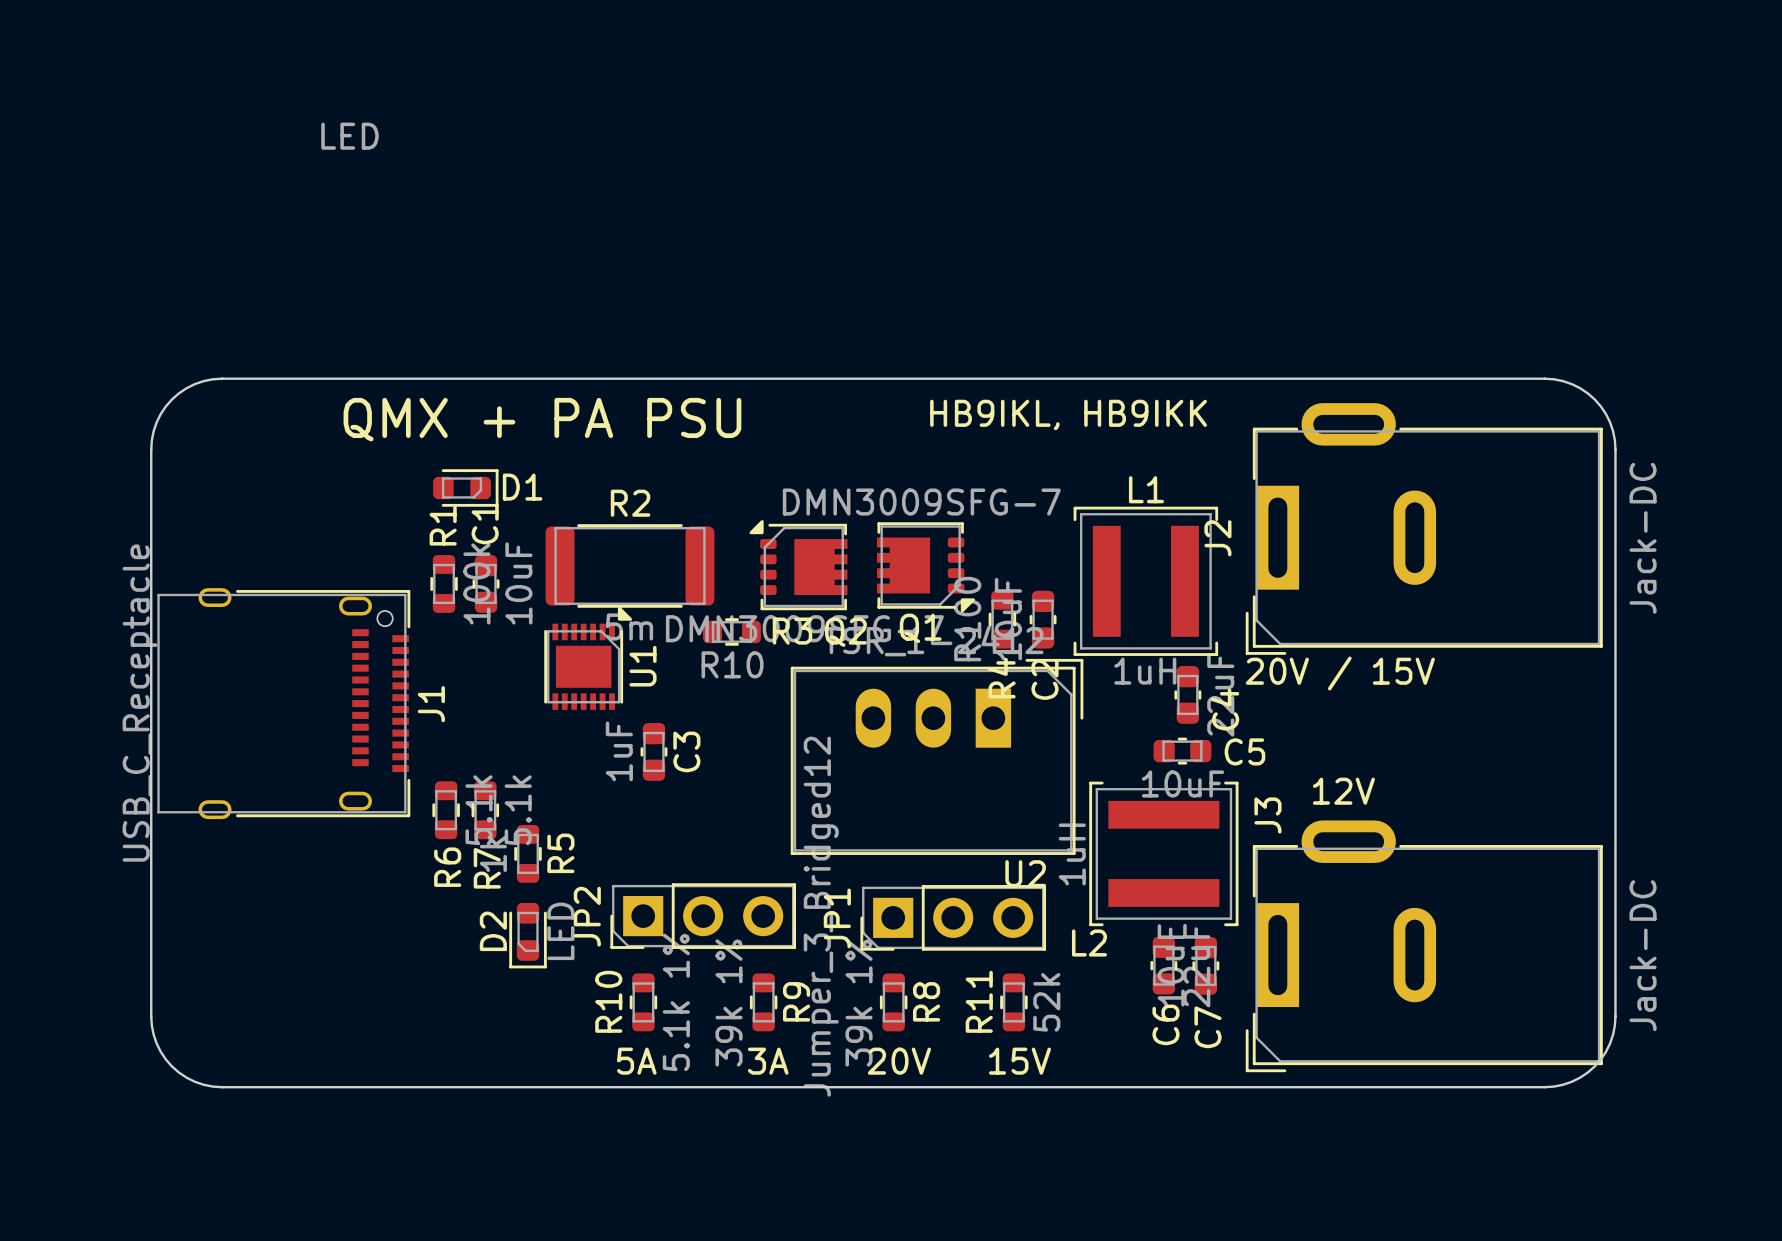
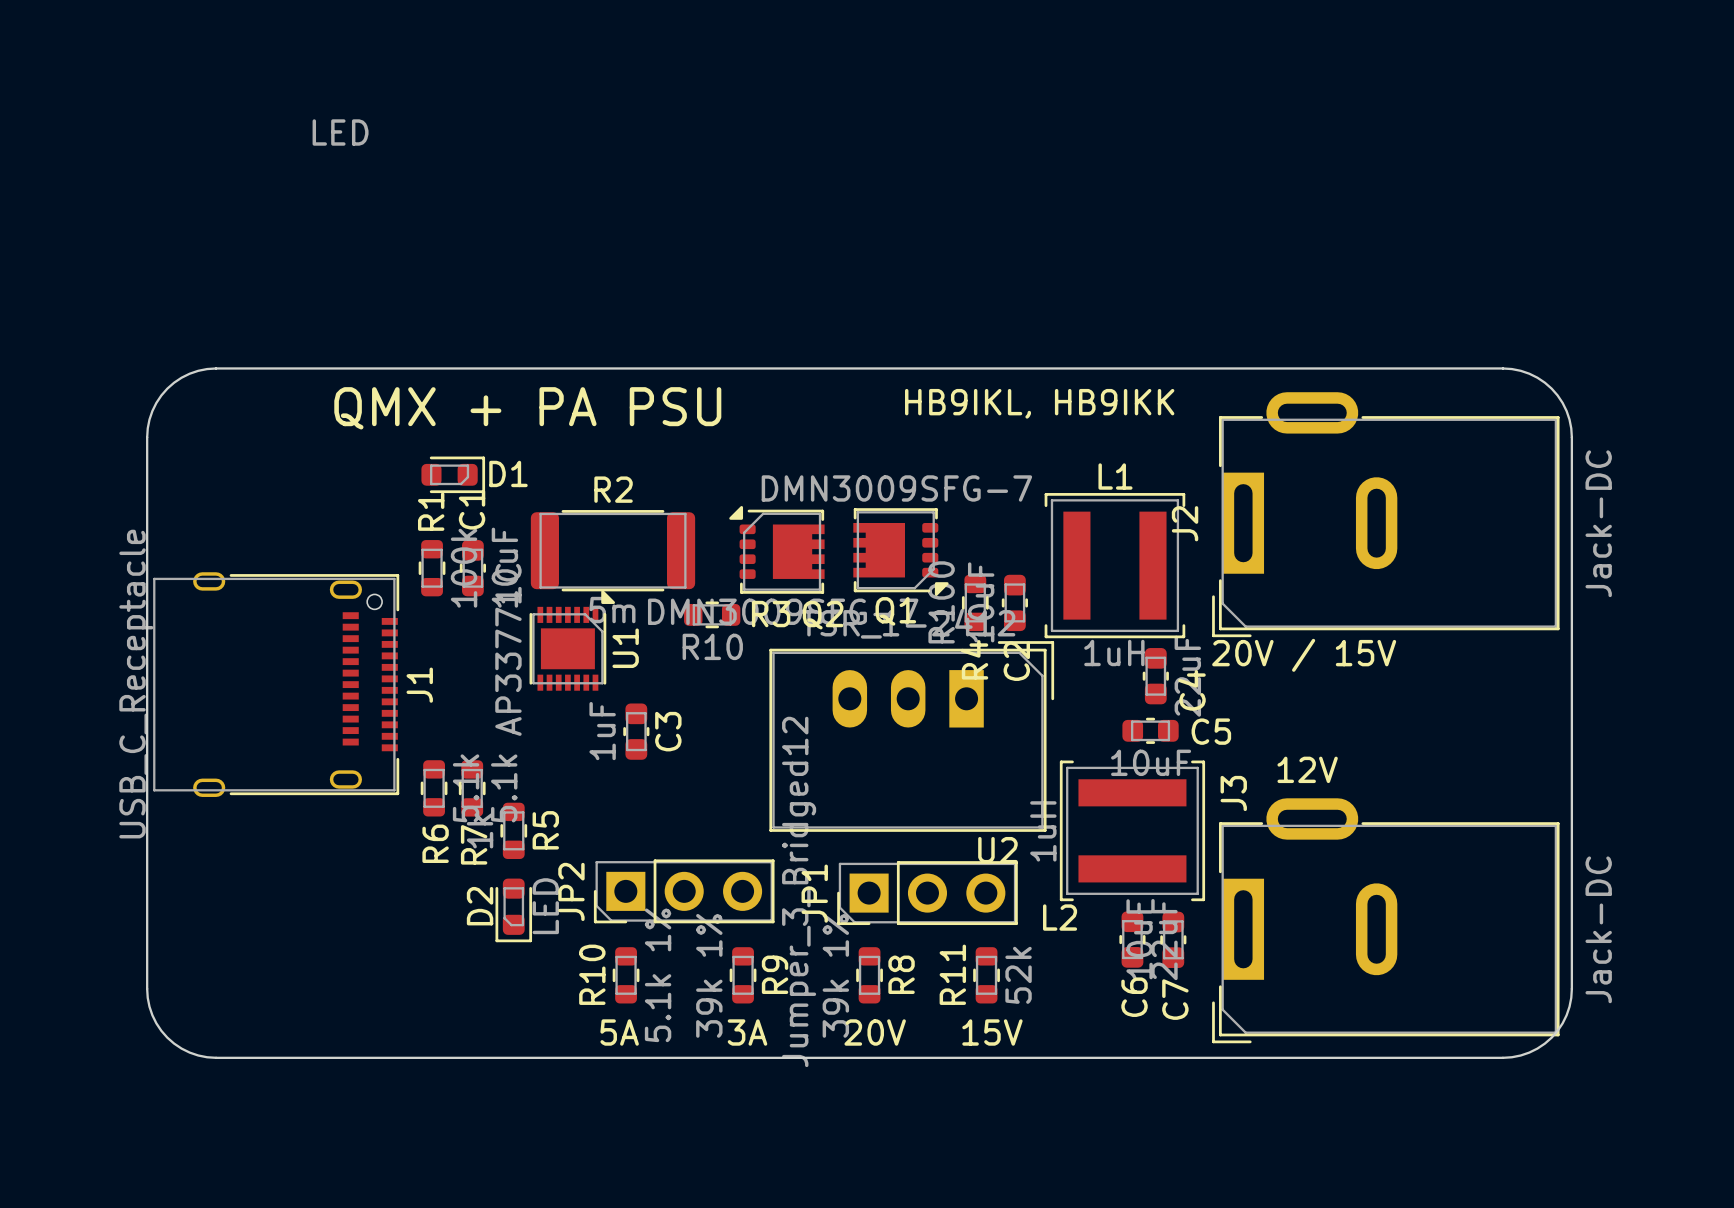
U1 value: none -> AP33771C (508, 649)

